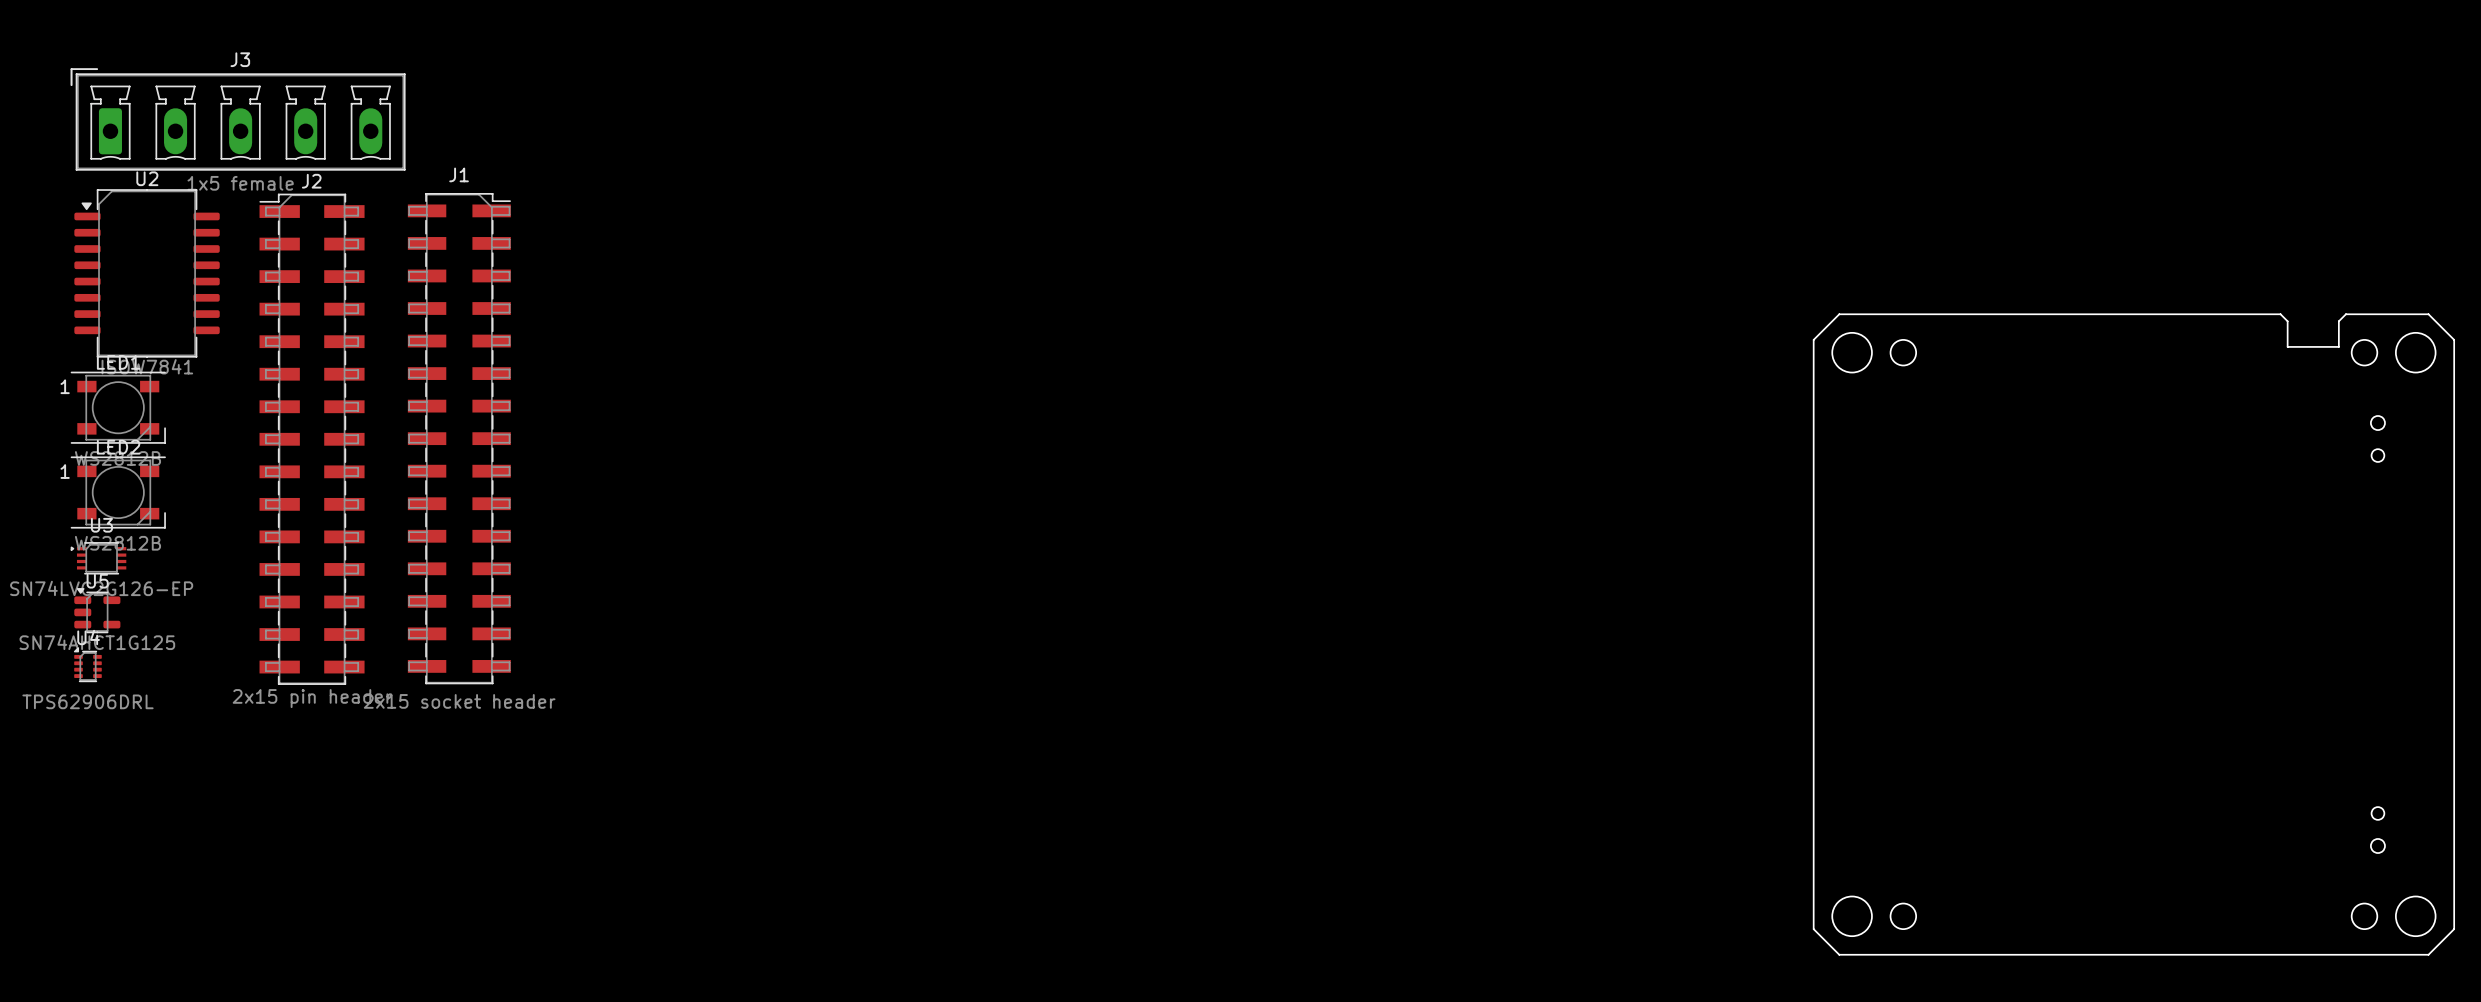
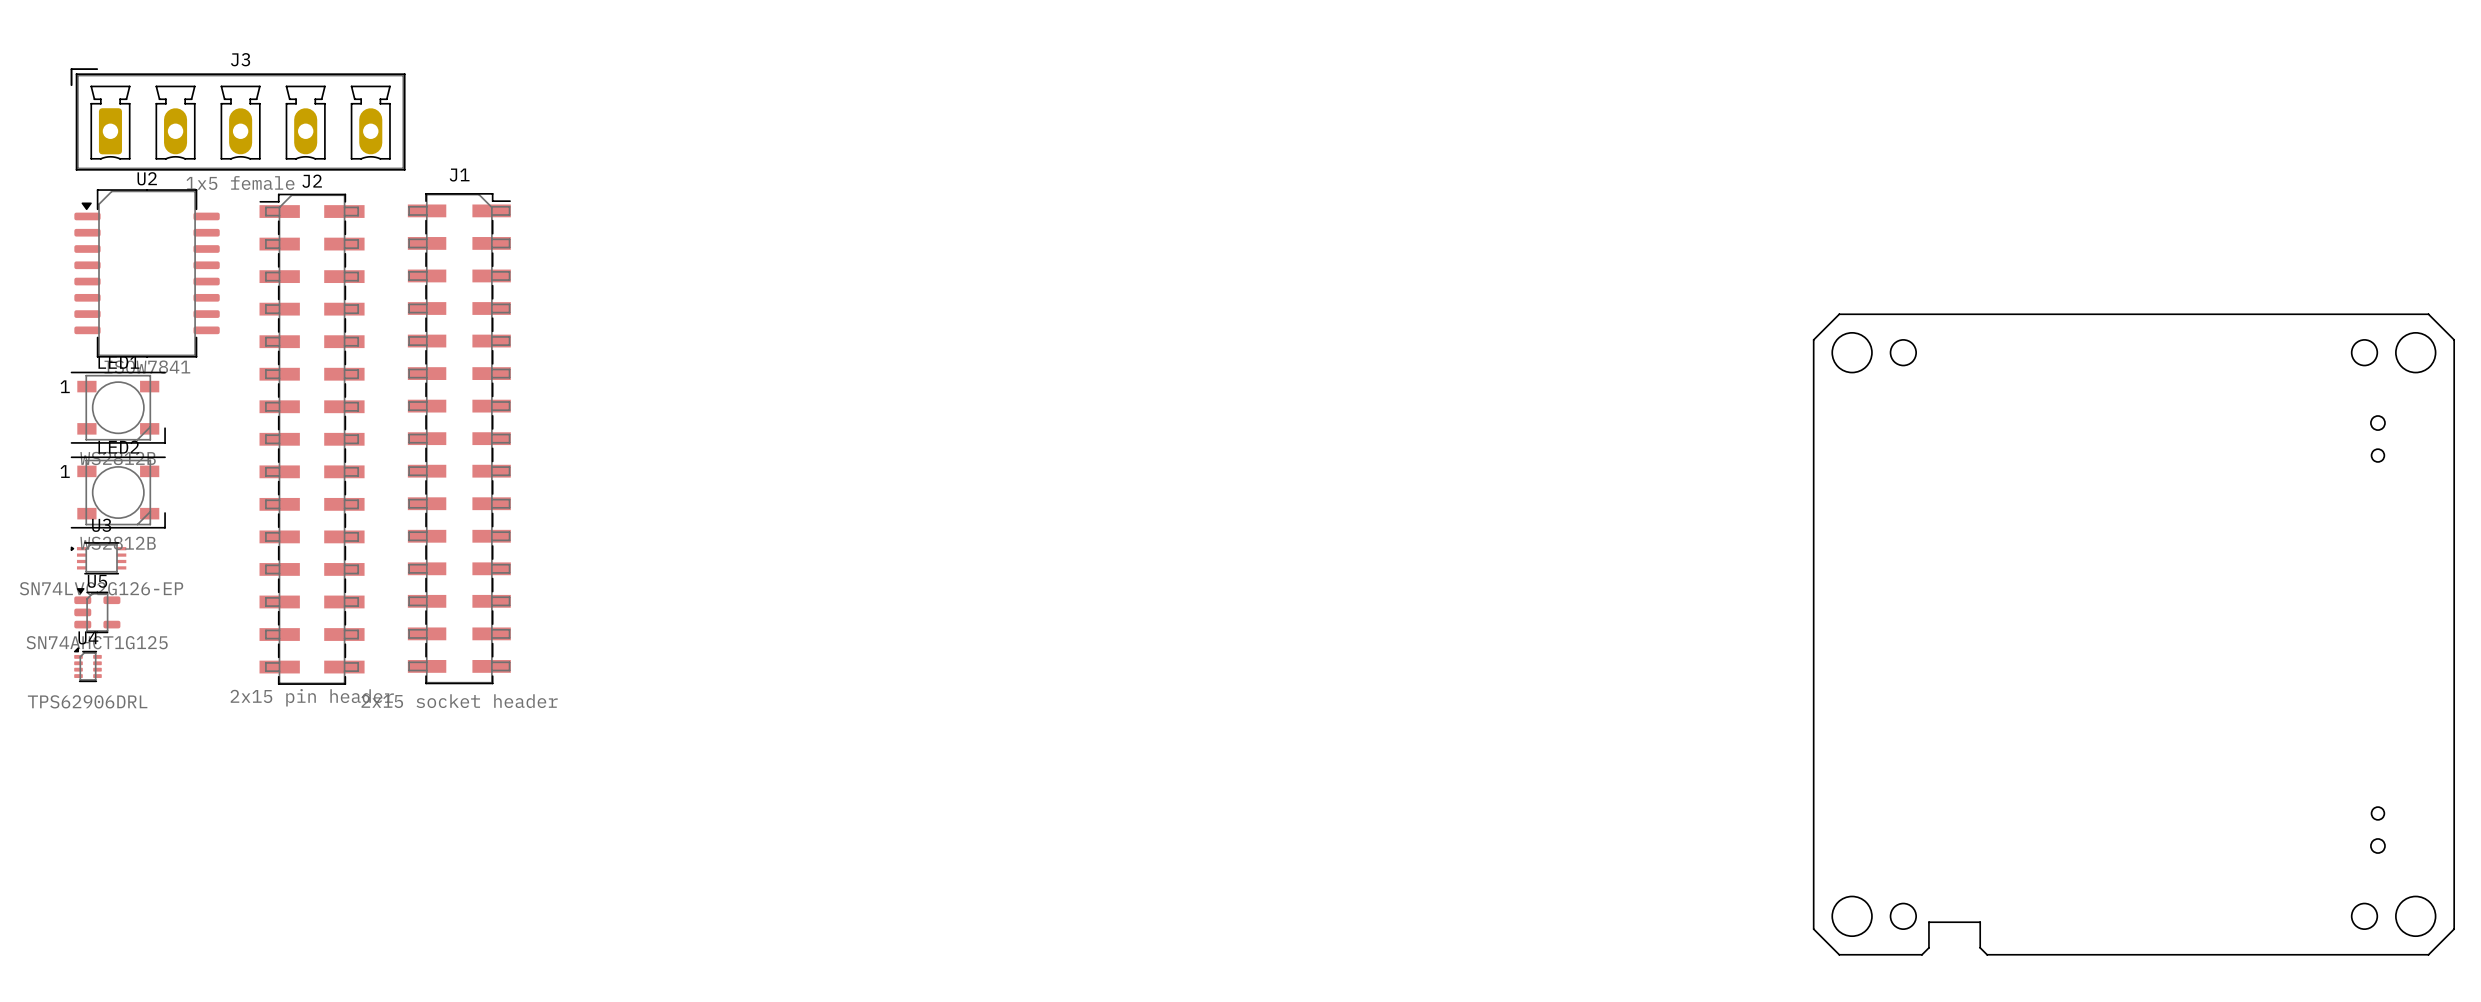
board edge: (2280, 314) (2287, 321) (2287, 346) (2338, 346) (2338, 321) (2345, 314) -> (2280, 314) (2345, 314)
board edge: (1922, 954) (1987, 954) -> (1922, 954) (1928, 947) (1928, 922) (1980, 922) (1980, 947) (1987, 954)

